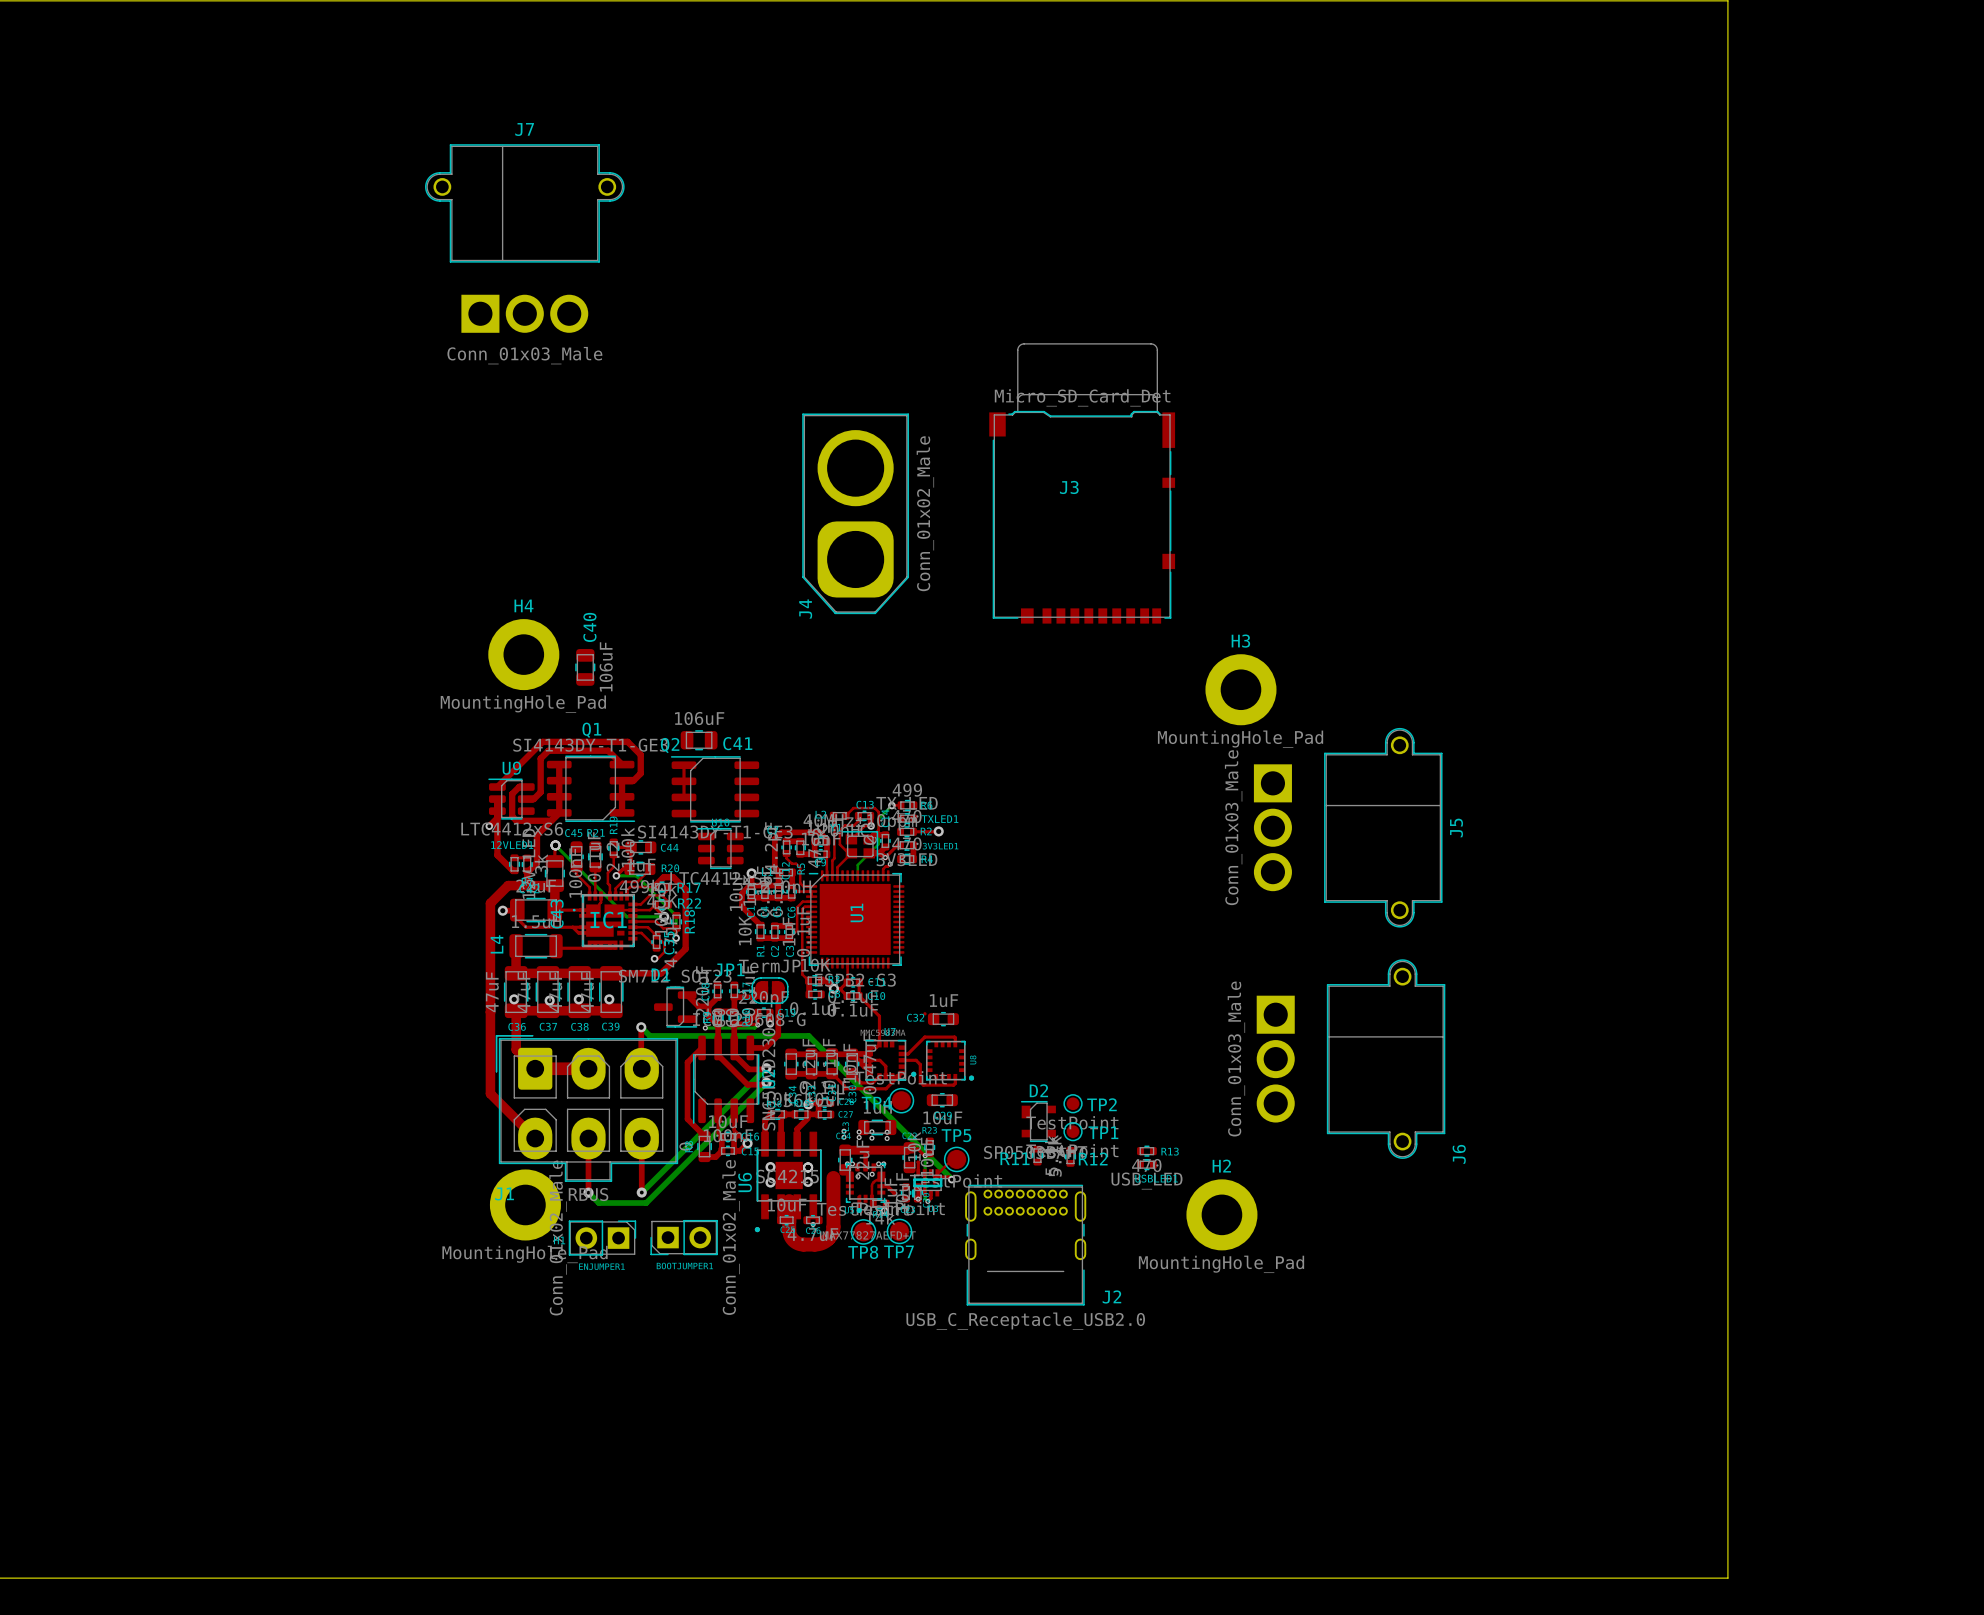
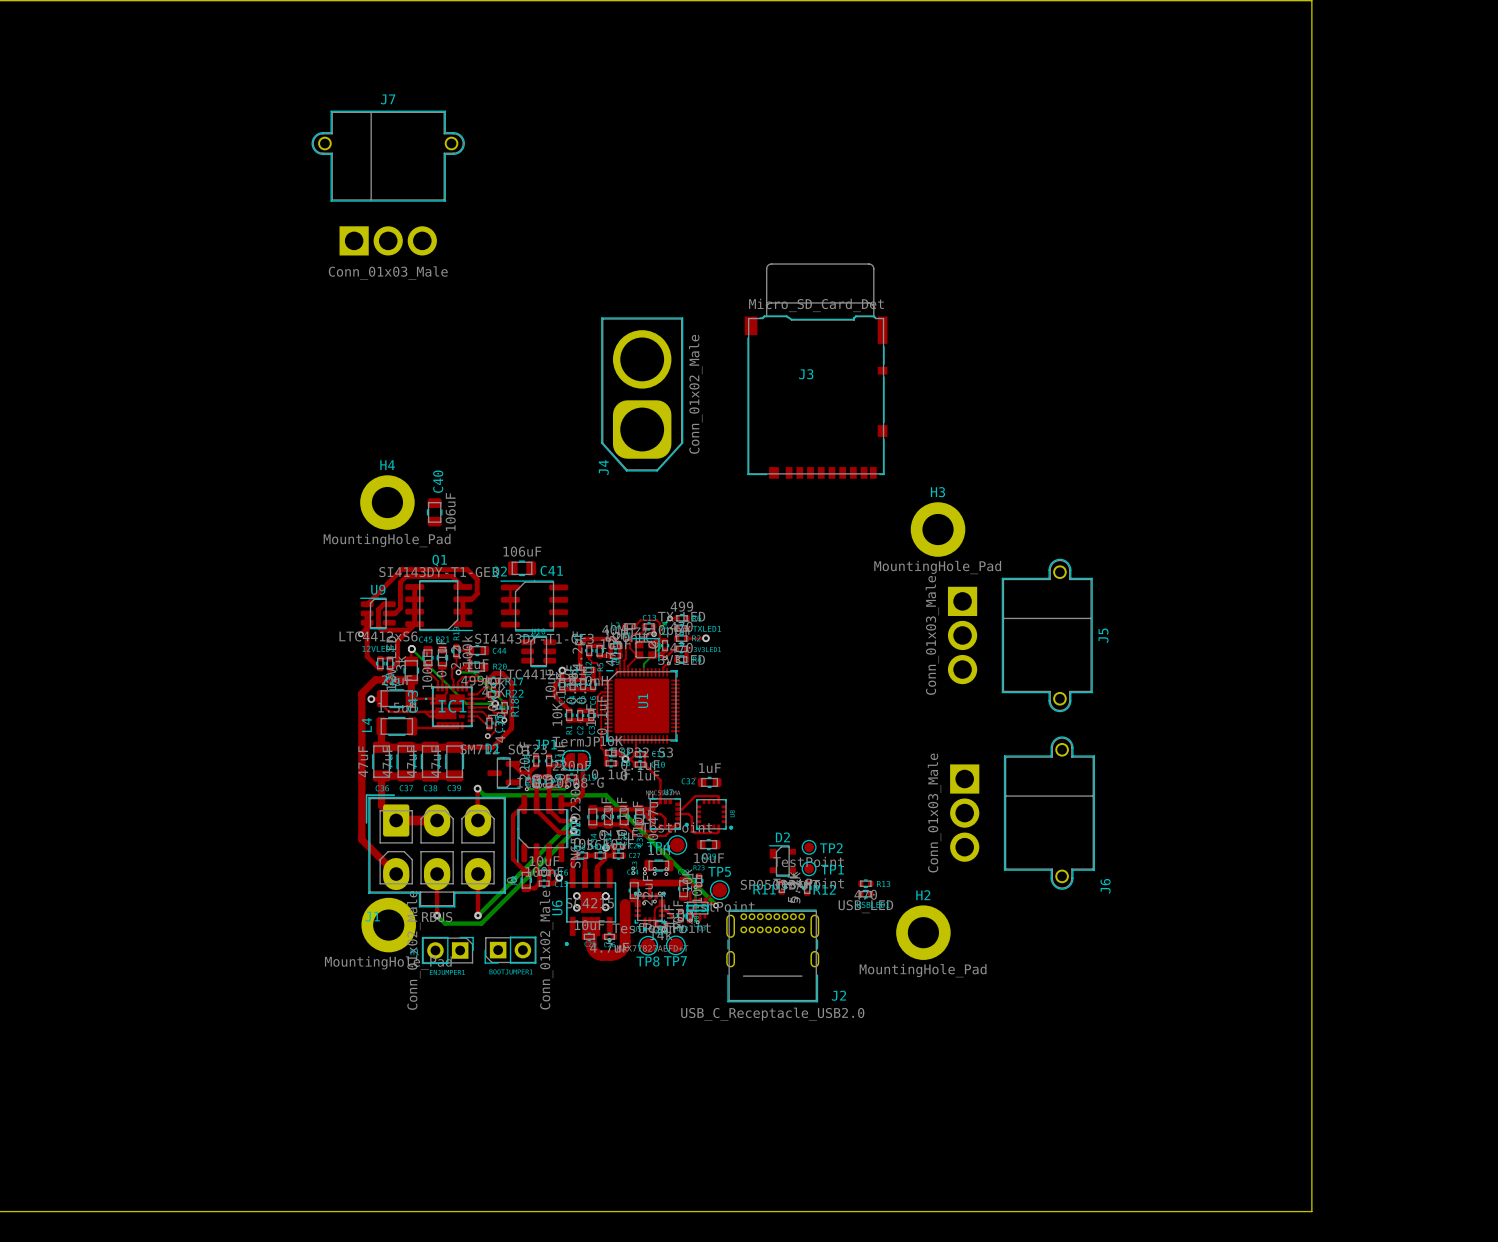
via: (514, 999) -> none
via: (578, 999) -> none
via: (609, 999) -> none
via: (549, 1000) -> none

